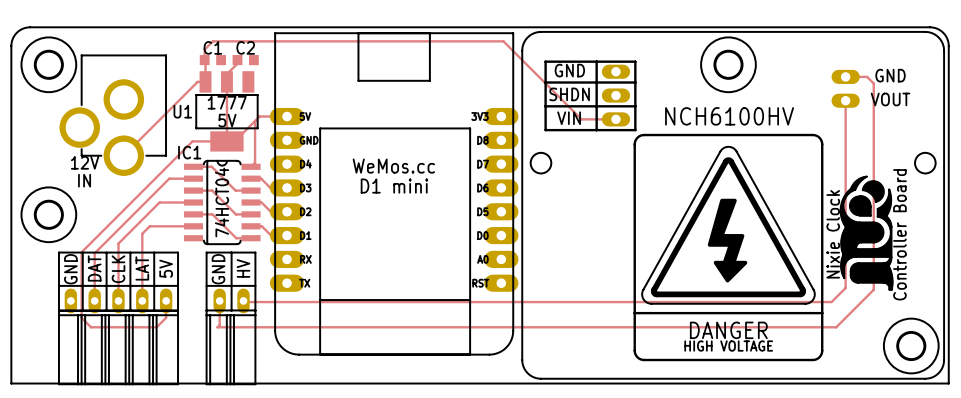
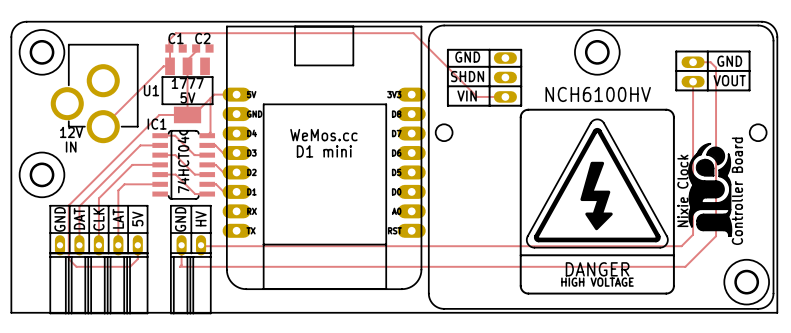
part footprint: [521, 31, 945, 380] -> [428, 24, 774, 310]

